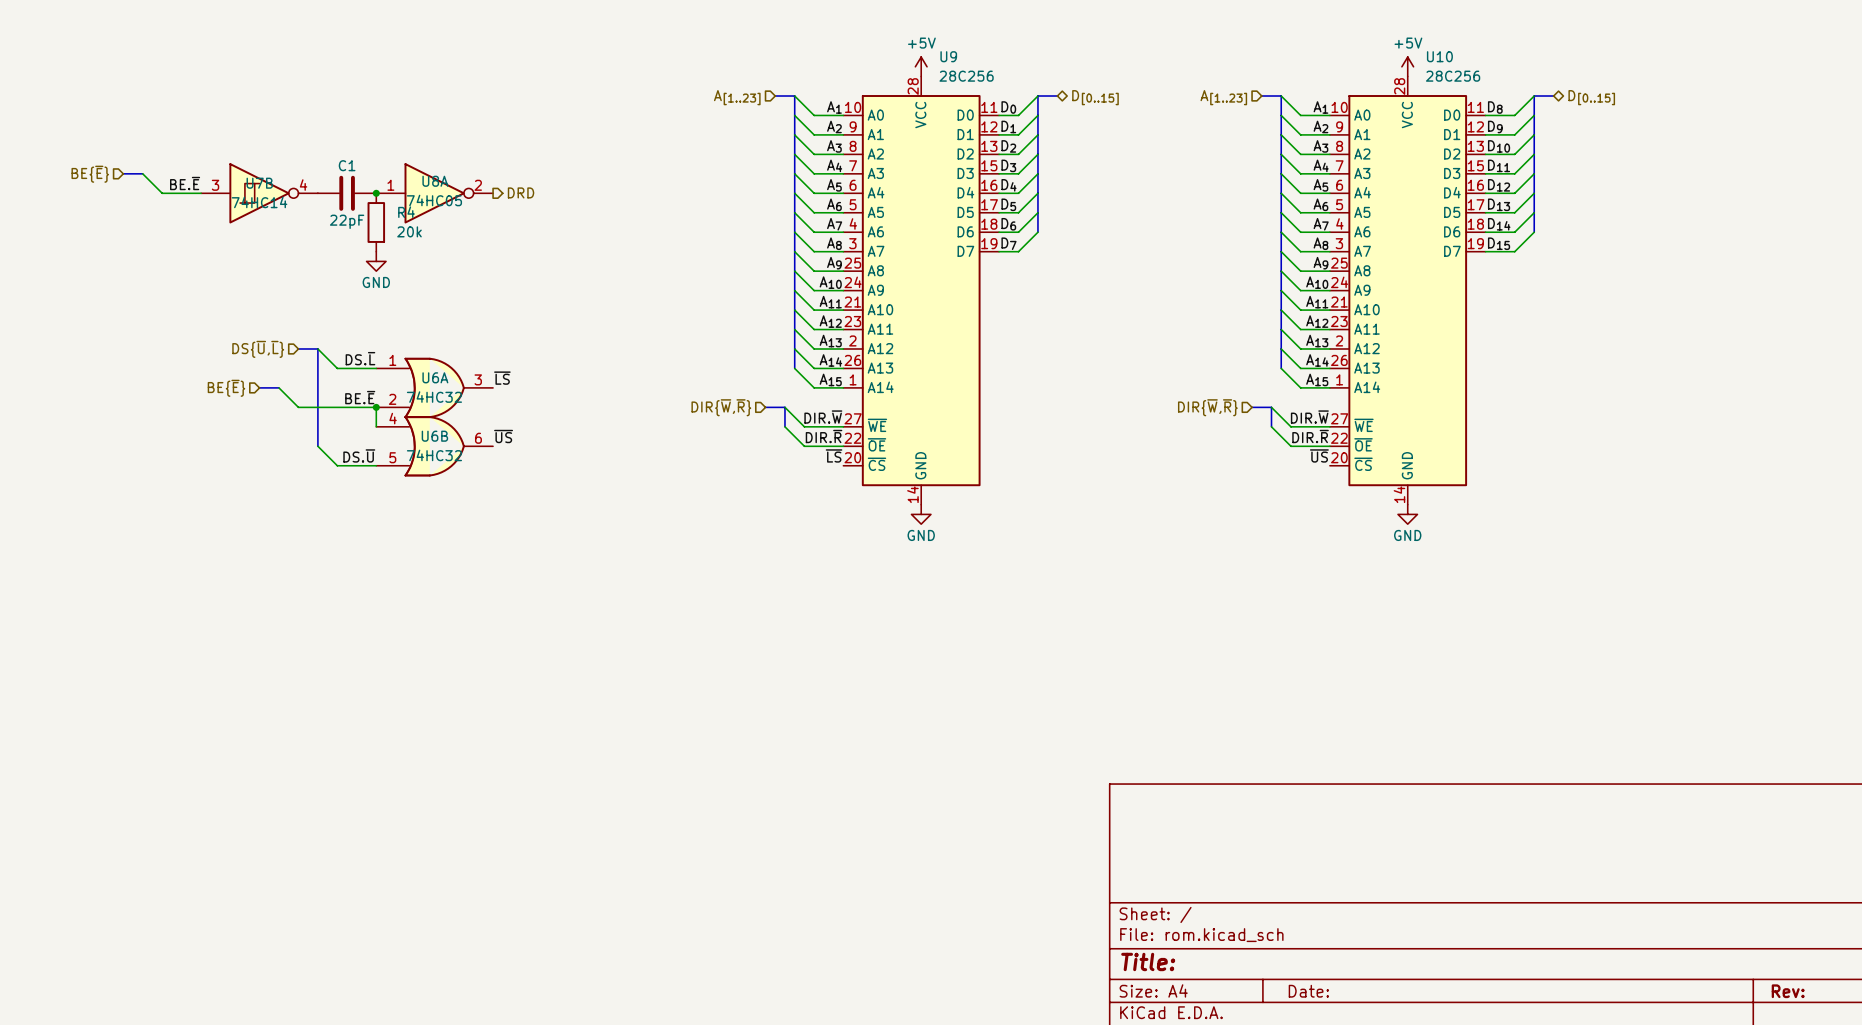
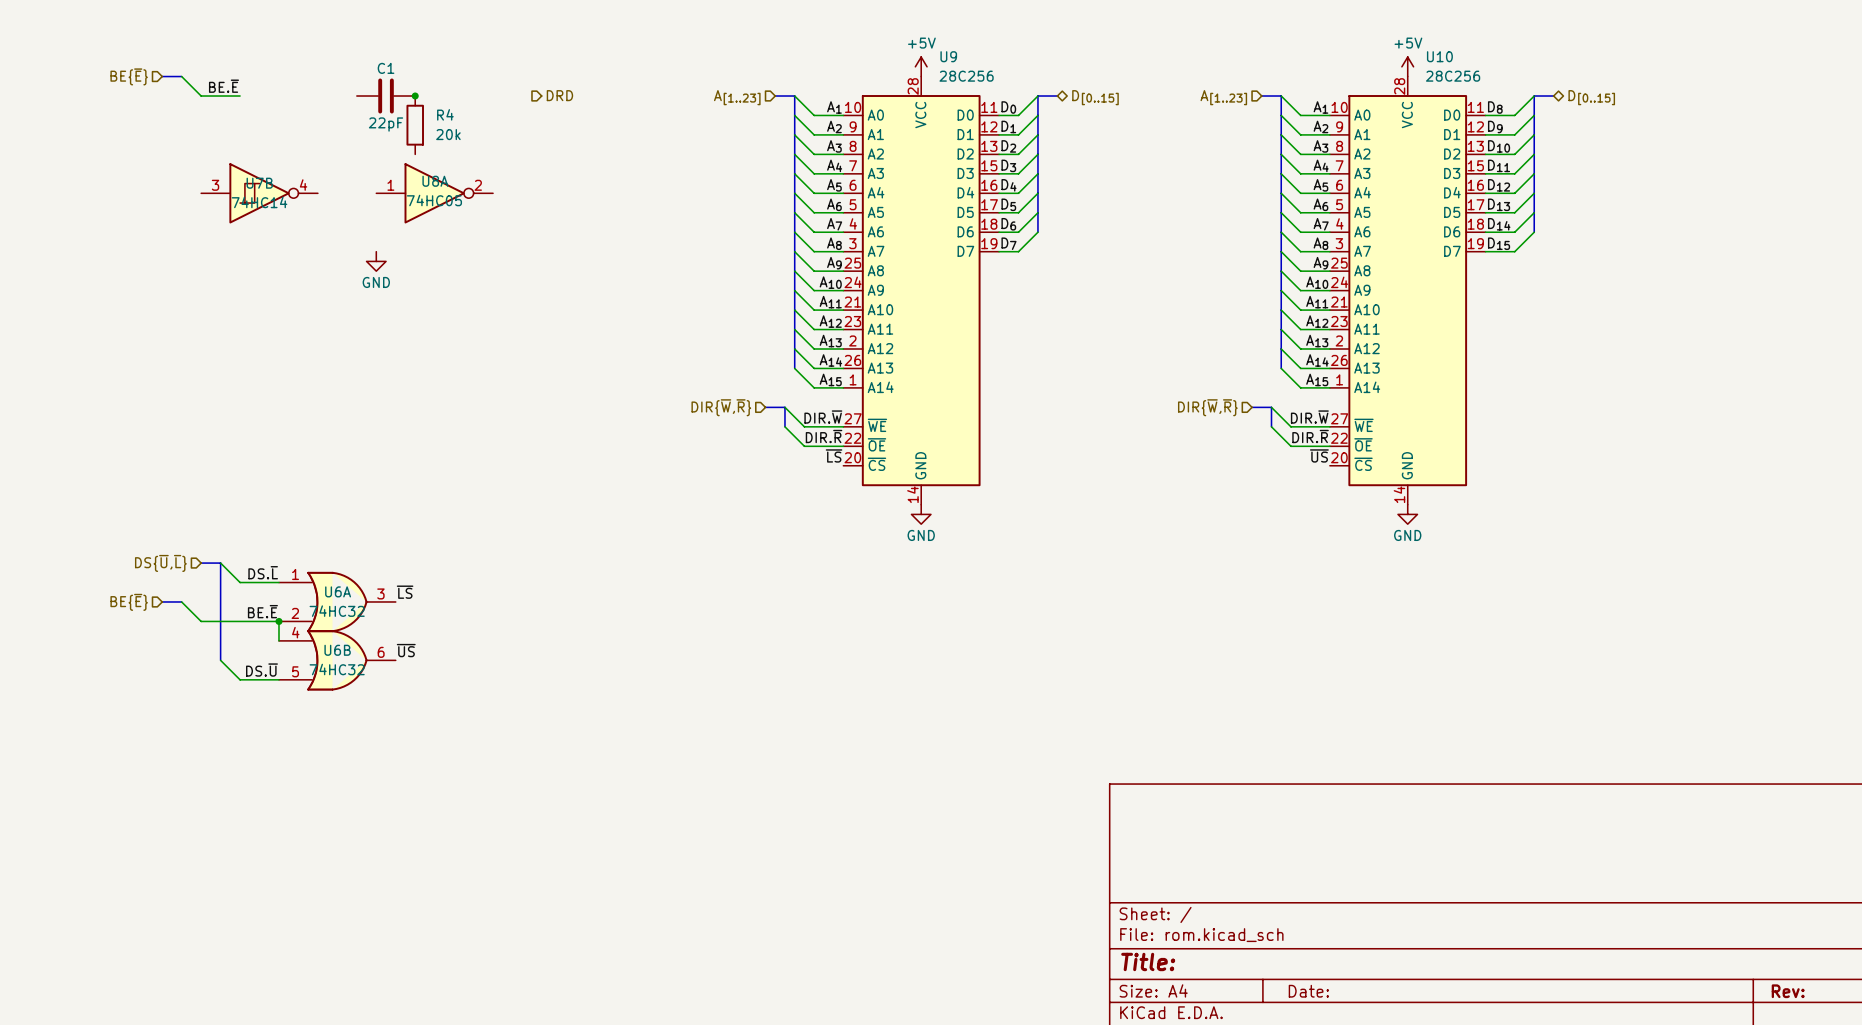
junction: none -> (415, 96)
bus: (123, 173) (142, 173) -> (162, 76) (181, 76)
wire: (142, 173) (162, 193) (201, 193) -> (181, 76) (201, 96) (240, 96)
hierarchical label position: BE{~{E}} (90, 174) -> BE{~{E}} (129, 76)
label position: BE.~{E} (185, 183) -> BE.~{E} (223, 86)
hierarchical label position: DRD (521, 192) -> DRD (559, 95)
C1 position: (347, 193) -> (386, 96)
junction: (376, 193) -> none
R4 position: (376, 222) -> (415, 125)
bus: (298, 348) (317, 348) (317, 446) -> none
wire: (317, 348) (337, 368) (376, 368) -> none
hierarchical label: DS{~{U},~{L}} (258, 349) -> none
label: DS.~{L} (360, 358) -> none
label: ~{LS} (502, 378) -> none
bus: (259, 387) (278, 387) -> none
wire: (278, 387) (298, 407) (376, 407) (376, 426) -> none
U6A position: (434, 387) -> (337, 601)
hierarchical label: BE{~{E}} (226, 388) -> none
label: BE.~{E} (360, 397) -> none
junction: (376, 407) -> none
label: ~{US} (503, 436) -> none
wire: (317, 446) (337, 465) (376, 465) -> (220, 563) (240, 582) (278, 582)
U6B position: (434, 446) -> (337, 660)
label: DS.~{U} (359, 455) -> none
hierarchical label: none -> DS{~{U},~{L}} (160, 563)
bus: none -> (201, 563) (220, 563) (220, 660)
label: none -> DS.~{L} (263, 572)
label: none -> ~{LS} (405, 592)
bus: none -> (162, 601) (181, 601)
wire: none -> (181, 601) (201, 621) (278, 621) (278, 640)
hierarchical label: none -> BE{~{E}} (129, 602)
label: none -> BE.~{E} (262, 611)
junction: none -> (278, 621)
label: none -> ~{US} (406, 650)
wire: none -> (220, 660) (240, 679) (278, 679)
label: none -> DS.~{U} (261, 670)

